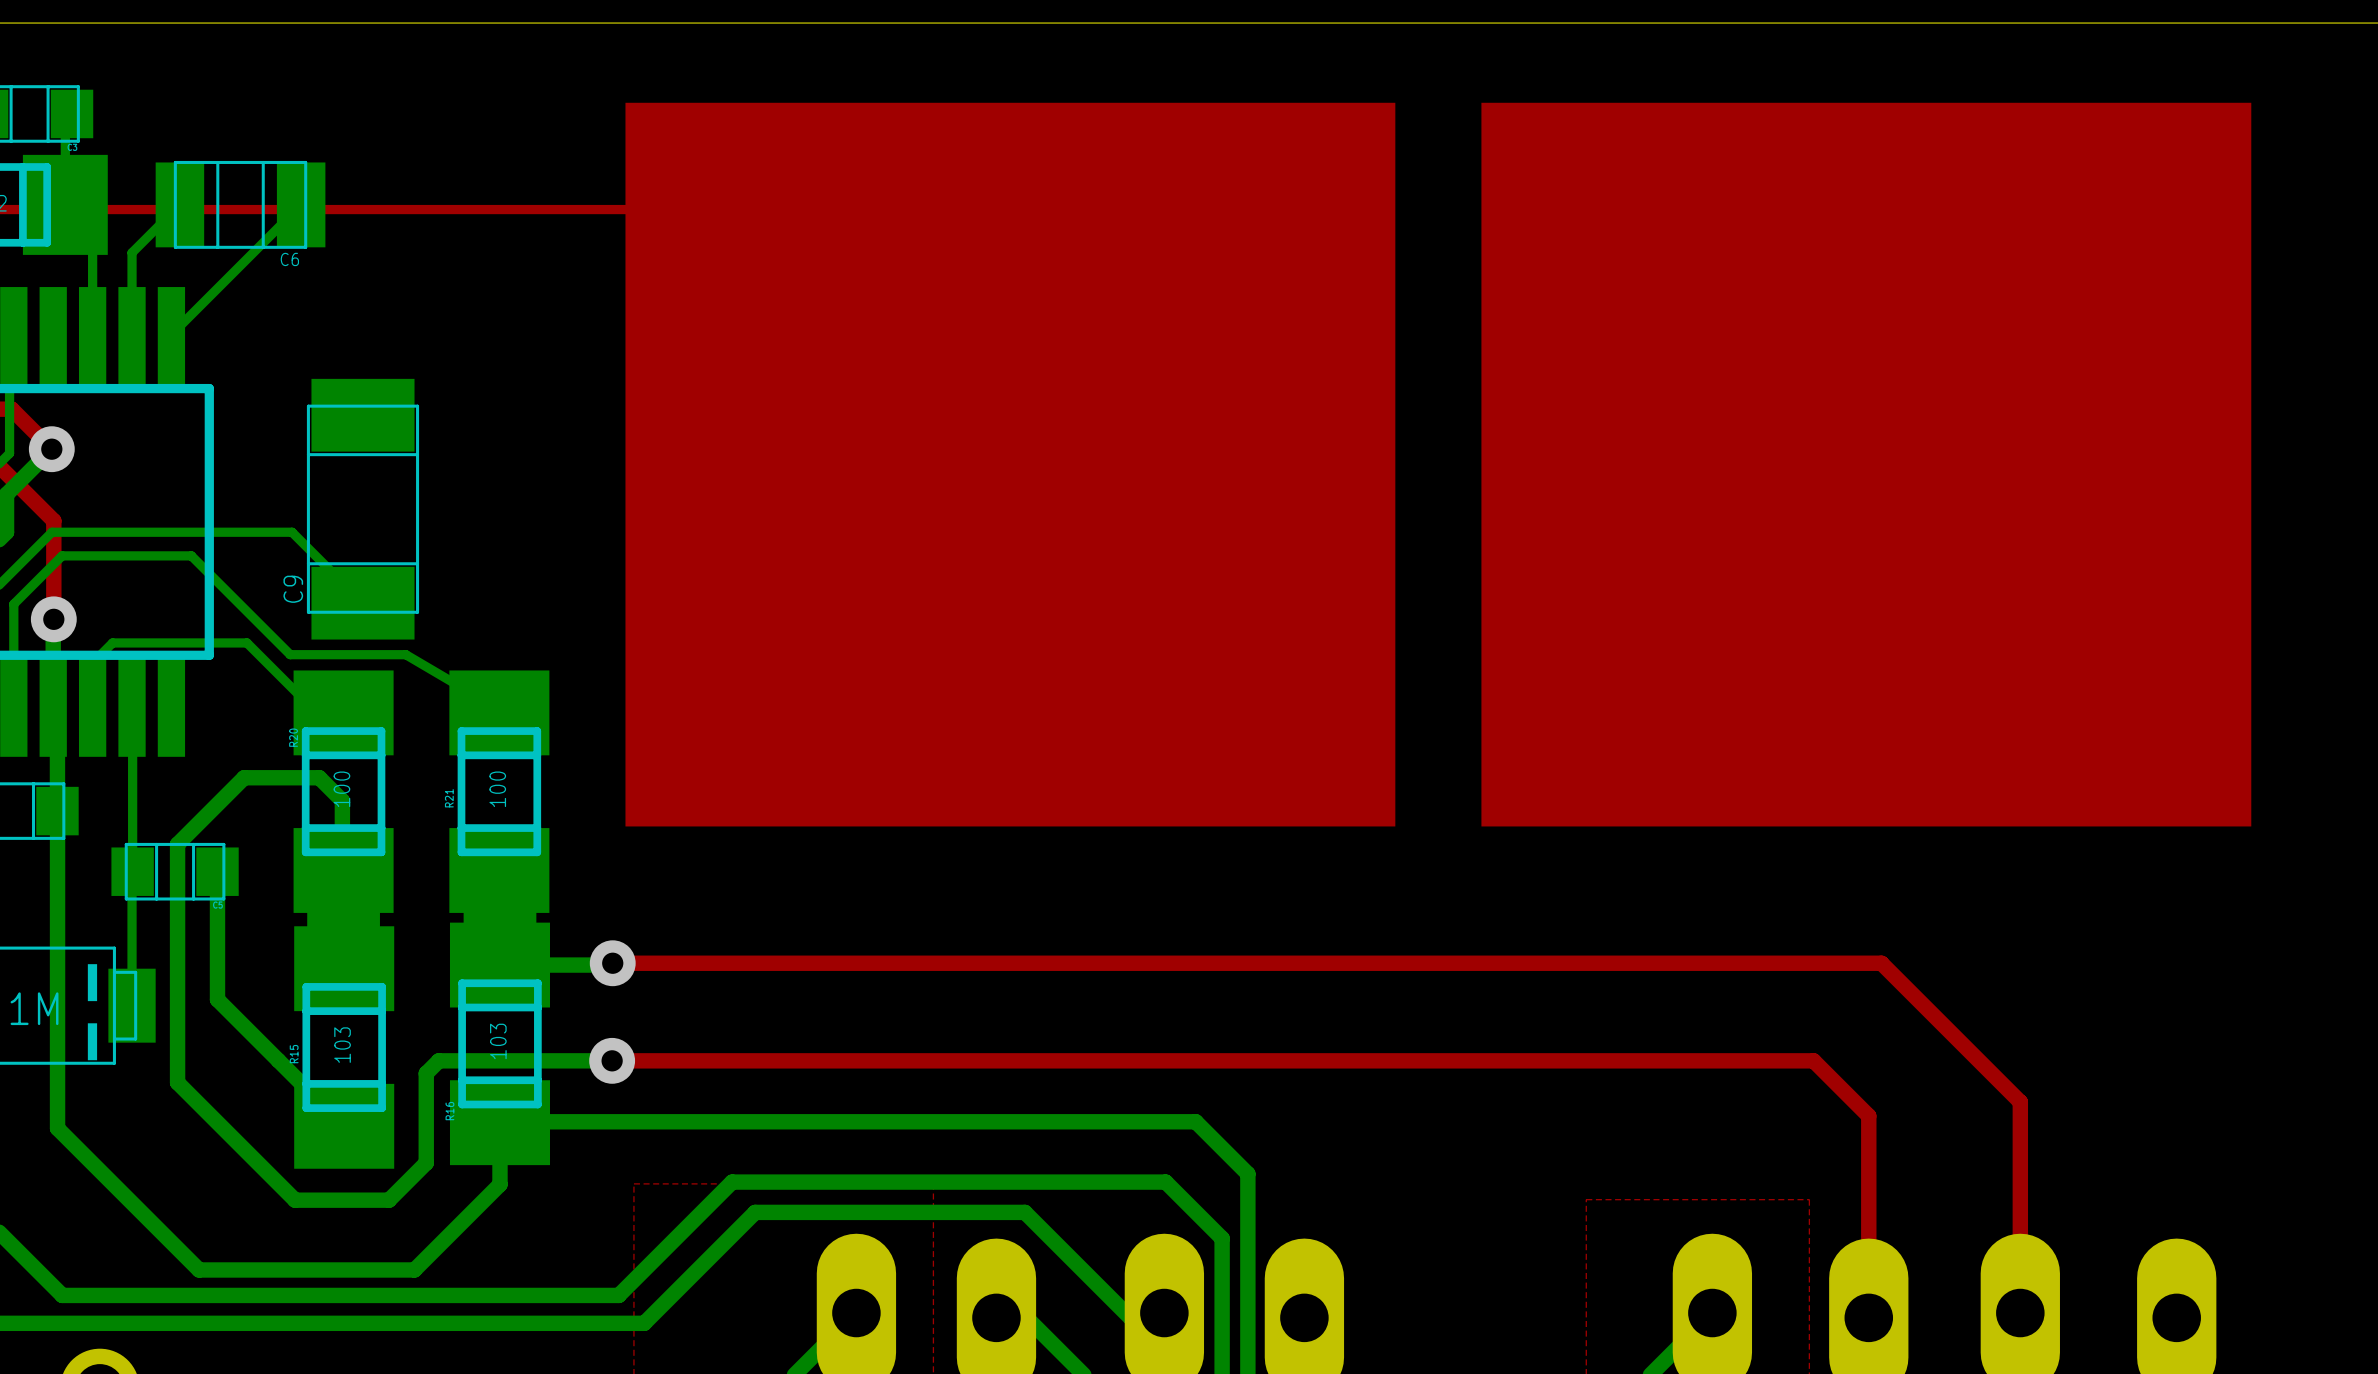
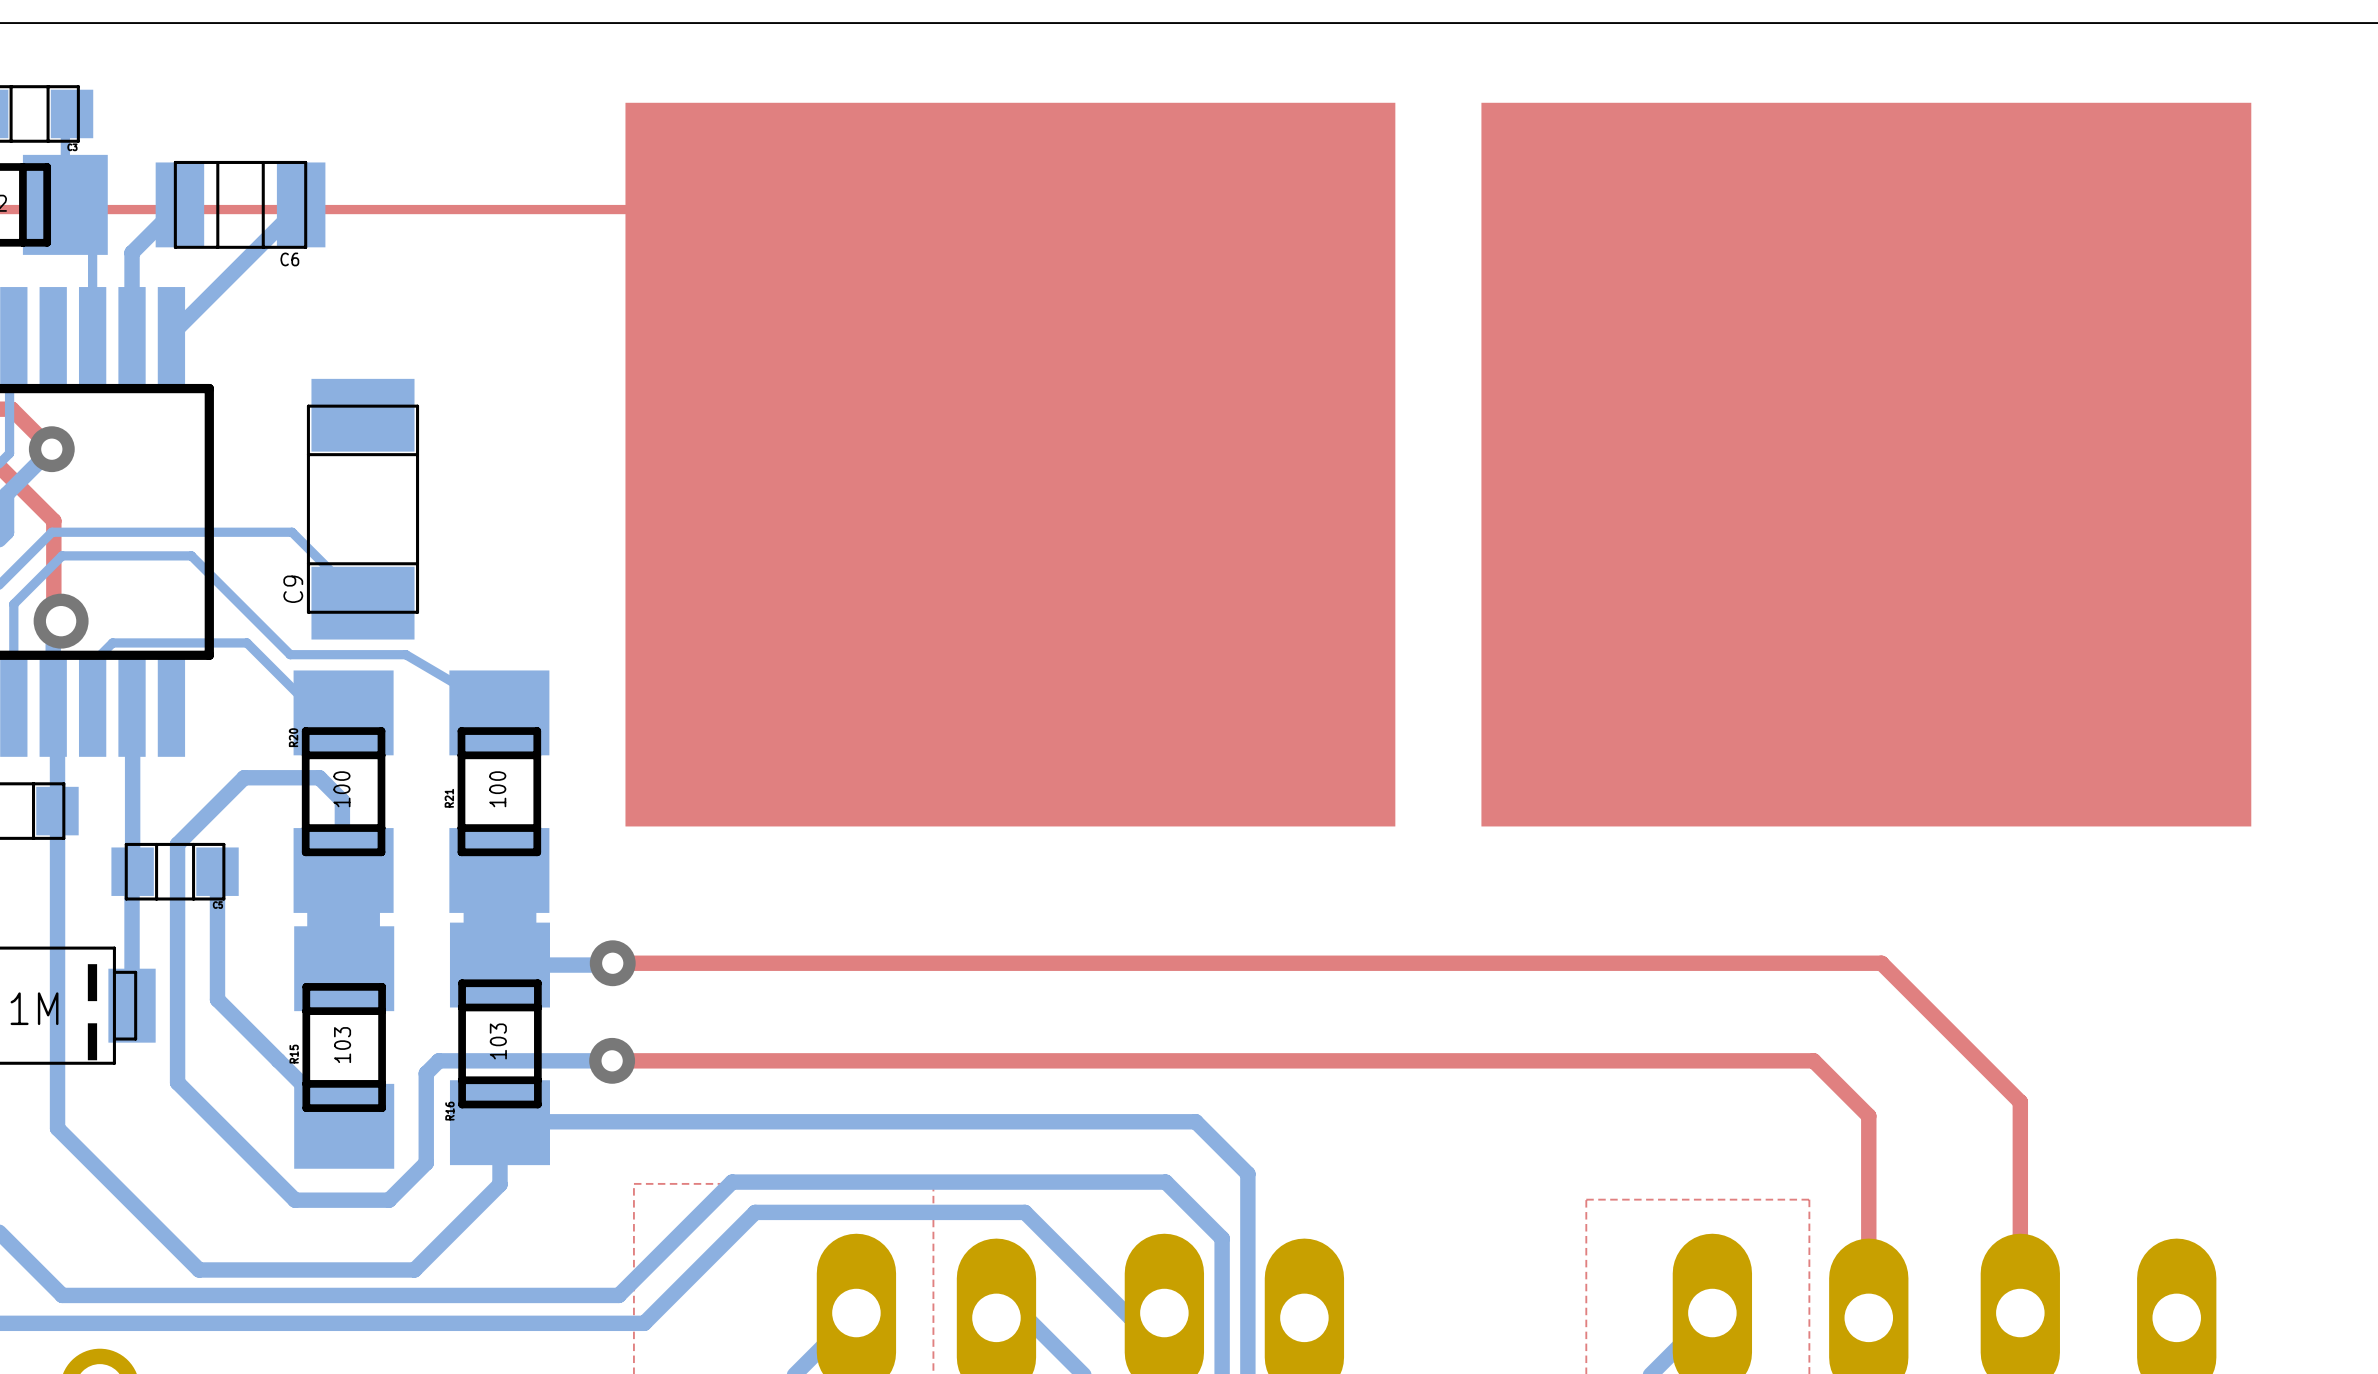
bottom track width: thin (179, 204) (132, 252) (132, 337) -> thick (179, 204) (132, 252) (132, 337)
bottom track width: thin (301, 204) (171, 334) -> thick (301, 204) (171, 334)
via size: [30, 596, 77, 643] -> [33, 593, 89, 649]
bottom track width: thin (132, 707) (132, 871) -> thick (132, 707) (132, 871)
bottom track width: thin (132, 872) (132, 1005) -> thick (132, 872) (132, 1005)

